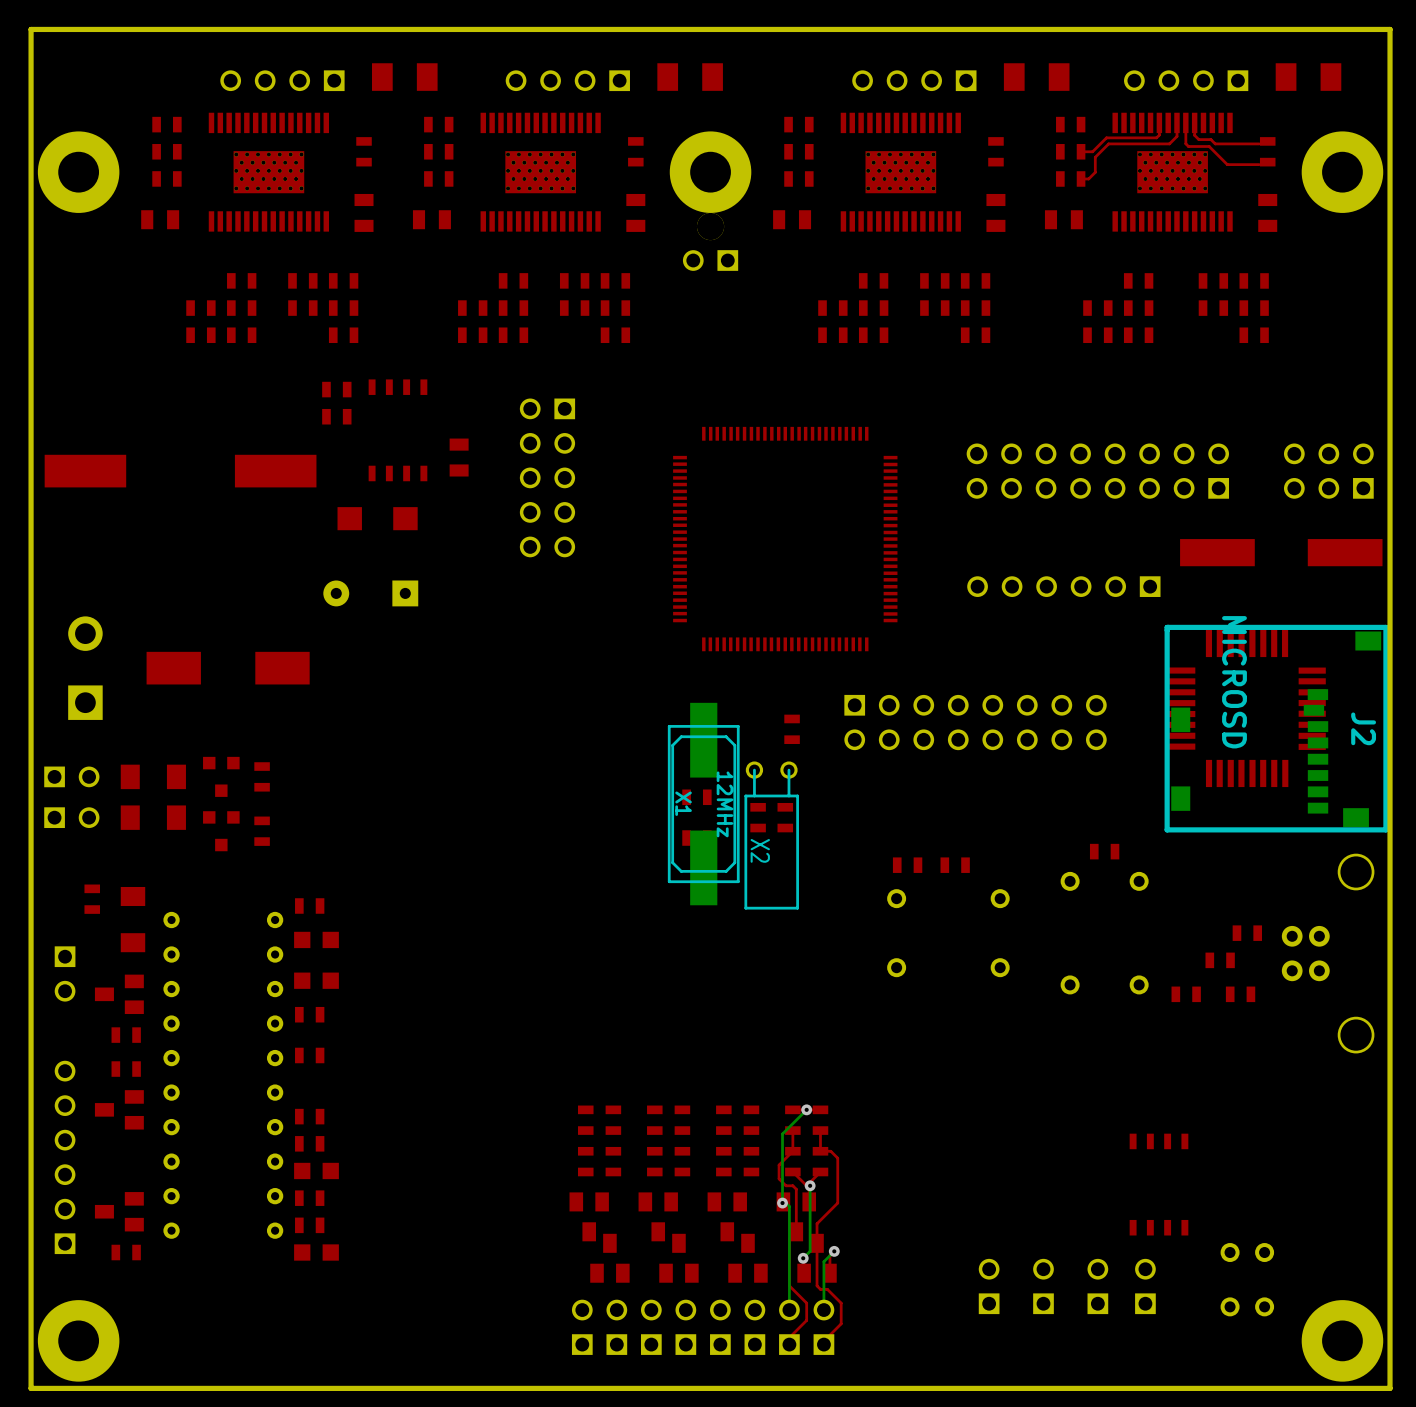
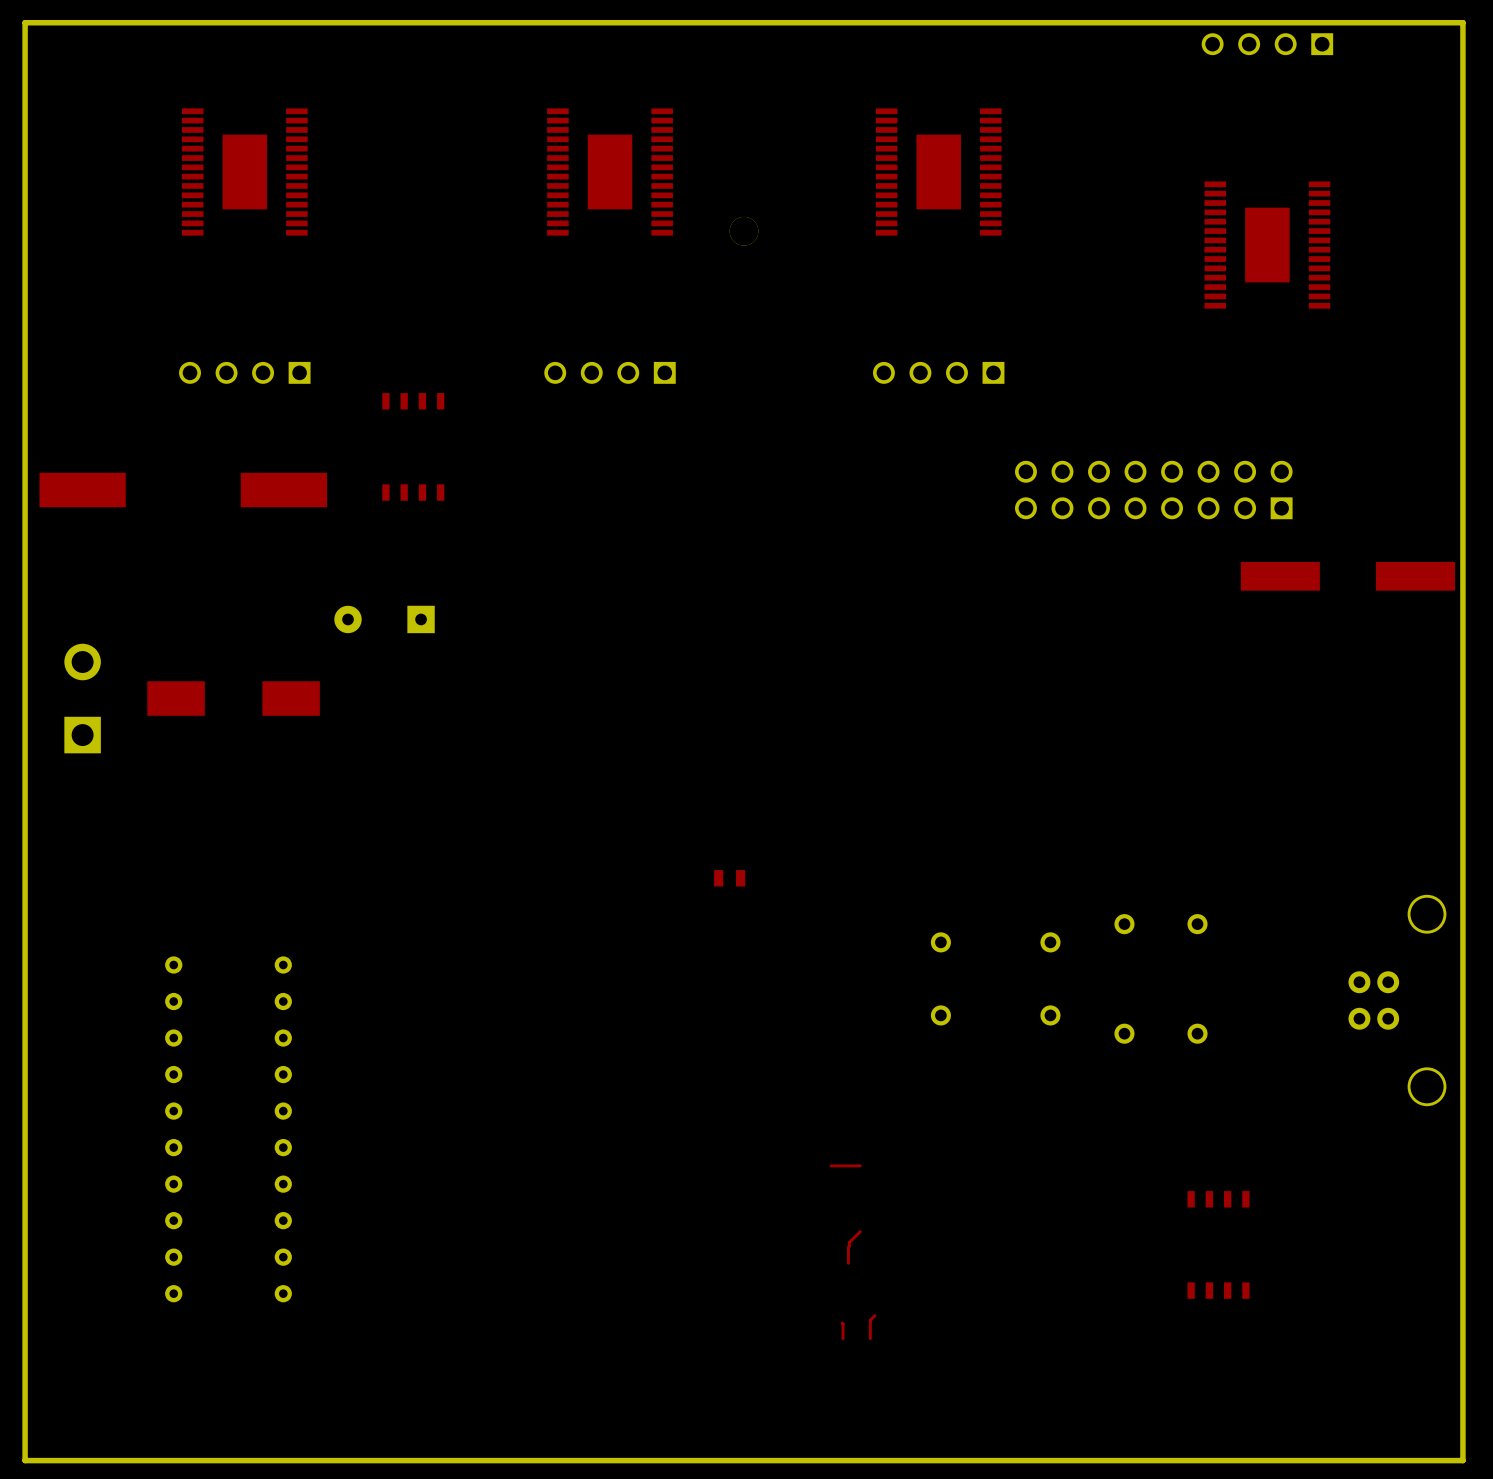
part: (404, 77) -> none
part: (690, 77) -> none
part: (1036, 77) -> none
part: (1308, 77) -> none
part: (282, 80) -> none
part: (567, 80) -> none
part: (914, 80) -> none
part position: (1186, 80) -> (1267, 44)
part footprint: [840, 112, 961, 232] -> [875, 108, 1002, 236]
top track: (1159, 122) (1159, 135) (1156, 137) (1106, 137) (1092, 151) (1081, 151) -> none
top track: (1177, 122) (1177, 136) (1169, 143) (1108, 143) (1095, 157) (1095, 172) (1088, 178) (1081, 178) -> none
top track: (1185, 122) (1185, 143) (1188, 146) (1209, 146) (1227, 164) (1259, 164) -> none
top track: (1194, 122) (1194, 135) (1198, 139) (1210, 139) (1215, 143) (1259, 143) -> none
part: (166, 124) -> none
part: (438, 124) -> none
part: (798, 124) -> none
part: (1070, 124) -> none
part: (166, 151) -> none
part: (364, 151) -> none
part: (438, 151) -> none
part: (635, 151) -> none
part: (798, 151) -> none
part: (995, 151) -> none
part: (1070, 151) -> none
part: (1267, 151) -> none
part: none -> (244, 172)
part: none -> (610, 172)
part: (78, 172) -> none
part: (268, 172) -> none
part: (540, 172) -> none
part: (710, 172) -> none
part: (1172, 172) -> none
part: (1342, 172) -> none
part: (166, 178) -> none
part: (438, 178) -> none
part: (798, 178) -> none
part: (1070, 178) -> none
part: (364, 212) -> none
part: (635, 212) -> none
part: (995, 212) -> none
part: (1267, 212) -> none
part: (160, 219) -> none
part: (431, 219) -> none
part: (792, 219) -> none
part: (1063, 219) -> none
part: none -> (1267, 245)
part: (710, 260) -> none
part: (241, 280) -> none
part: (302, 280) -> none
part: (343, 280) -> none
part: (513, 280) -> none
part: (574, 280) -> none
part: (615, 280) -> none
part: (873, 280) -> none
part: (934, 280) -> none
part: (975, 280) -> none
part: (1138, 280) -> none
part: (1213, 280) -> none
part: (1254, 280) -> none
part: (200, 308) -> none
part: (241, 308) -> none
part: (302, 308) -> none
part: (343, 308) -> none
part: (472, 308) -> none
part: (513, 308) -> none
part: (574, 308) -> none
part: (615, 308) -> none
part: (832, 308) -> none
part: (873, 308) -> none
part: (934, 308) -> none
part: (975, 308) -> none
part: (1097, 308) -> none
part: (1138, 308) -> none
part: (1213, 308) -> none
part: (1254, 308) -> none
part: (200, 335) -> none
part: (241, 335) -> none
part: (343, 335) -> none
part: (472, 335) -> none
part: (513, 335) -> none
part: (615, 335) -> none
part: (832, 335) -> none
part: (873, 335) -> none
part: (975, 335) -> none
part: (1097, 335) -> none
part: (1138, 335) -> none
part: (1254, 335) -> none
part: none -> (244, 372)
part: none -> (610, 372)
part: none -> (938, 372)
part: (336, 389) -> none
part: (336, 416) -> none
part: (459, 457) -> none
part: (1328, 471) -> none
part: (547, 477) -> none
part: (377, 518) -> none
part: (785, 539) -> none
part: (1063, 586) -> none
part: (1246, 708) -> none
part: (975, 722) -> none
J2: MICROSD (1276, 728) -> none
part: (792, 729) -> none
part: (71, 776) -> none
part: (153, 776) -> none
part: (221, 776) -> none
part: (262, 776) -> none
part: (696, 797) -> none
X1: 12MHz (703, 804) -> none
part: (71, 817) -> none
part: (153, 817) -> none
part: (758, 817) -> none
part: (785, 817) -> none
part: (221, 831) -> none
part: (262, 831) -> none
X2: (771, 835) -> none
part: (1104, 851) -> none
part: (907, 865) -> none
part: (955, 865) -> none
part: (92, 899) -> none
part: (309, 905) -> none
part: (132, 919) -> none
part: (1247, 933) -> none
part: (316, 939) -> none
part: (1220, 960) -> none
part: (65, 973) -> none
part: (316, 980) -> none
part: (119, 994) -> none
part: (1186, 994) -> none
part: (1240, 994) -> none
part: (309, 1014) -> none
part: (126, 1035) -> none
part: (309, 1055) -> none
part: (126, 1069) -> none
part: (119, 1109) -> none
bottom track: (806, 1109) (782, 1134) (782, 1203) (785, 1203) (789, 1206) (789, 1310) -> none
via: (806, 1109) -> none
part: (309, 1116) -> none
part: (585, 1120) -> none
part: (613, 1120) -> none
part: (654, 1120) -> none
part: (682, 1120) -> none
part: (723, 1120) -> none
part: (751, 1120) -> none
part: (792, 1120) -> none
part: (820, 1120) -> none
top track: (792, 1130) (792, 1151) (779, 1165) (779, 1178) (785, 1185) (792, 1185) (796, 1189) (796, 1231) (789, 1238) (789, 1285) (806, 1303) (806, 1320) (789, 1337) (789, 1344) -> none
top track: (820, 1130) (820, 1151) (830, 1151) (837, 1158) (837, 1203) (817, 1223) (817, 1285) (820, 1289) (827, 1289) (841, 1303) (841, 1323) (823, 1341) (823, 1344) -> none
part: (309, 1143) -> none
part: (65, 1157) -> none
part: (585, 1161) -> none
part: (613, 1161) -> none
part: (654, 1161) -> none
part: (682, 1161) -> none
part: (723, 1161) -> none
part: (751, 1161) -> none
part: (792, 1161) -> none
part: (820, 1161) -> none
part: (316, 1170) -> none
top track: (792, 1171) (806, 1185) (810, 1185) -> none
bottom track: (810, 1185) (810, 1251) (803, 1258) -> none
via: (810, 1185) -> none
part: (309, 1198) -> none
via: (782, 1203) -> none
part: (119, 1211) -> none
part: (589, 1216) -> none
part: (658, 1216) -> none
part: (727, 1216) -> none
part: (796, 1216) -> none
part: (309, 1225) -> none
bottom track: (834, 1251) (823, 1261) (823, 1310) -> none
via: (834, 1251) -> none
part: (126, 1252) -> none
part: (316, 1252) -> none
part: (1247, 1252) -> none
part: (609, 1258) -> none
part: (678, 1258) -> none
part: (747, 1258) -> none
via: (803, 1258) -> none
part: (817, 1258) -> none
part: (989, 1286) -> none
part: (1043, 1286) -> none
part: (1097, 1286) -> none
part: (1145, 1286) -> none
part: (1247, 1306) -> none
part: (582, 1327) -> none
part: (616, 1327) -> none
part: (651, 1327) -> none
part: (685, 1327) -> none
part: (720, 1327) -> none
part: (754, 1327) -> none
part: (789, 1327) -> none
part: (823, 1327) -> none
part: (78, 1340) -> none
part: (1342, 1340) -> none

